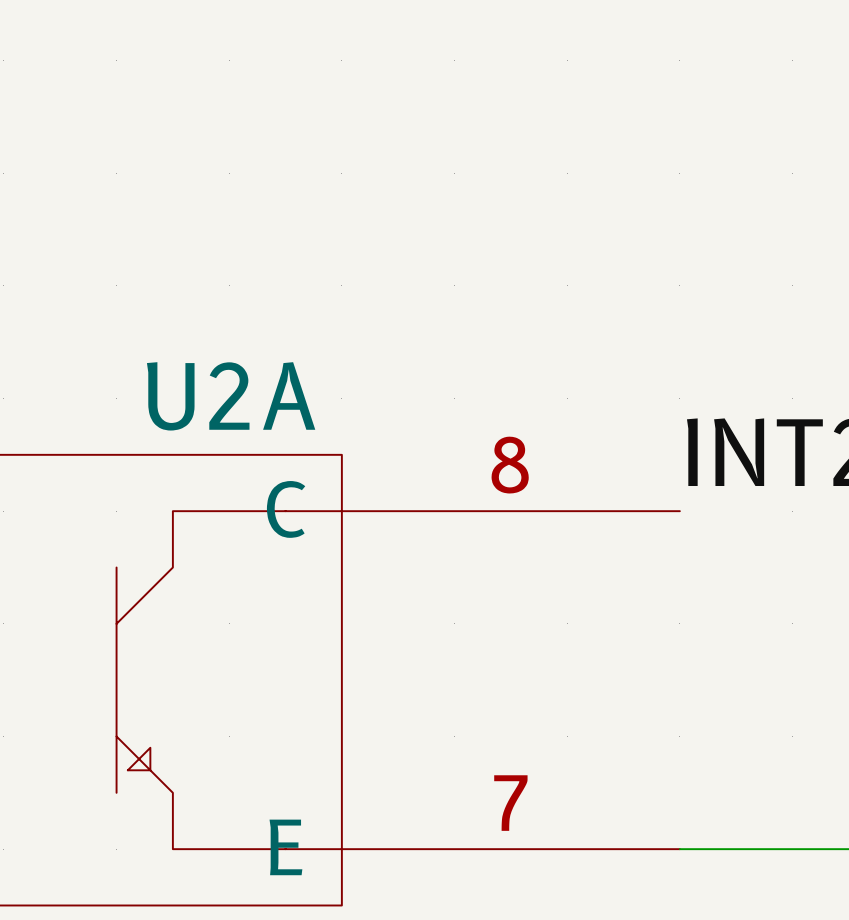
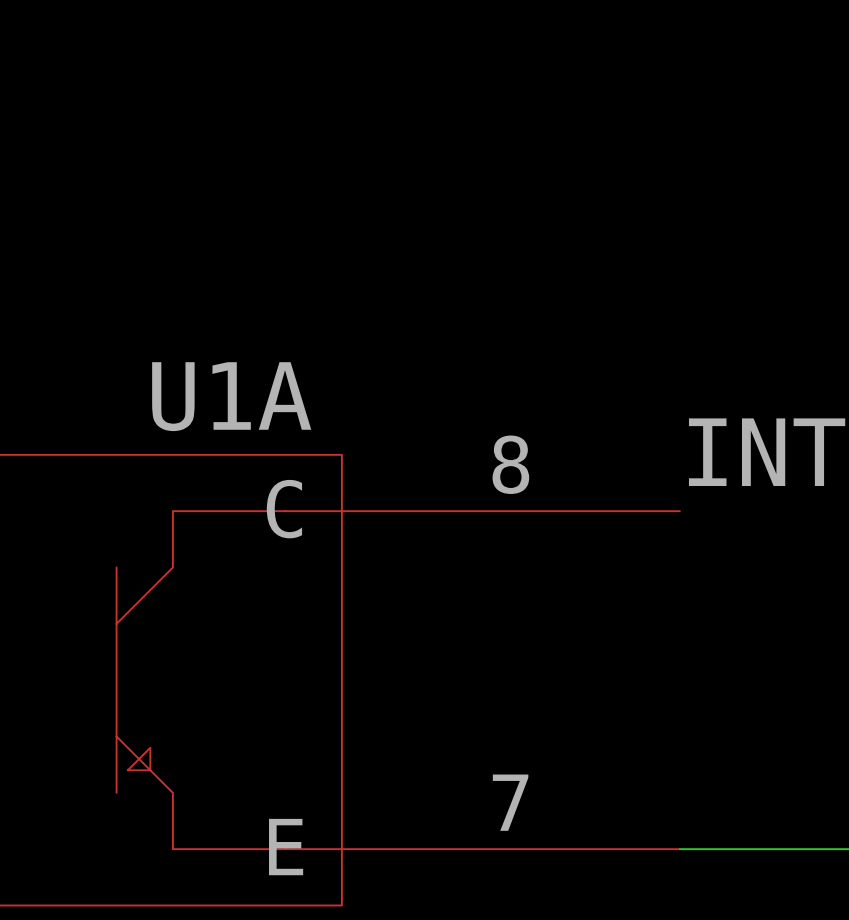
U2A name: U2A (231, 396) -> U1A (231, 396)

